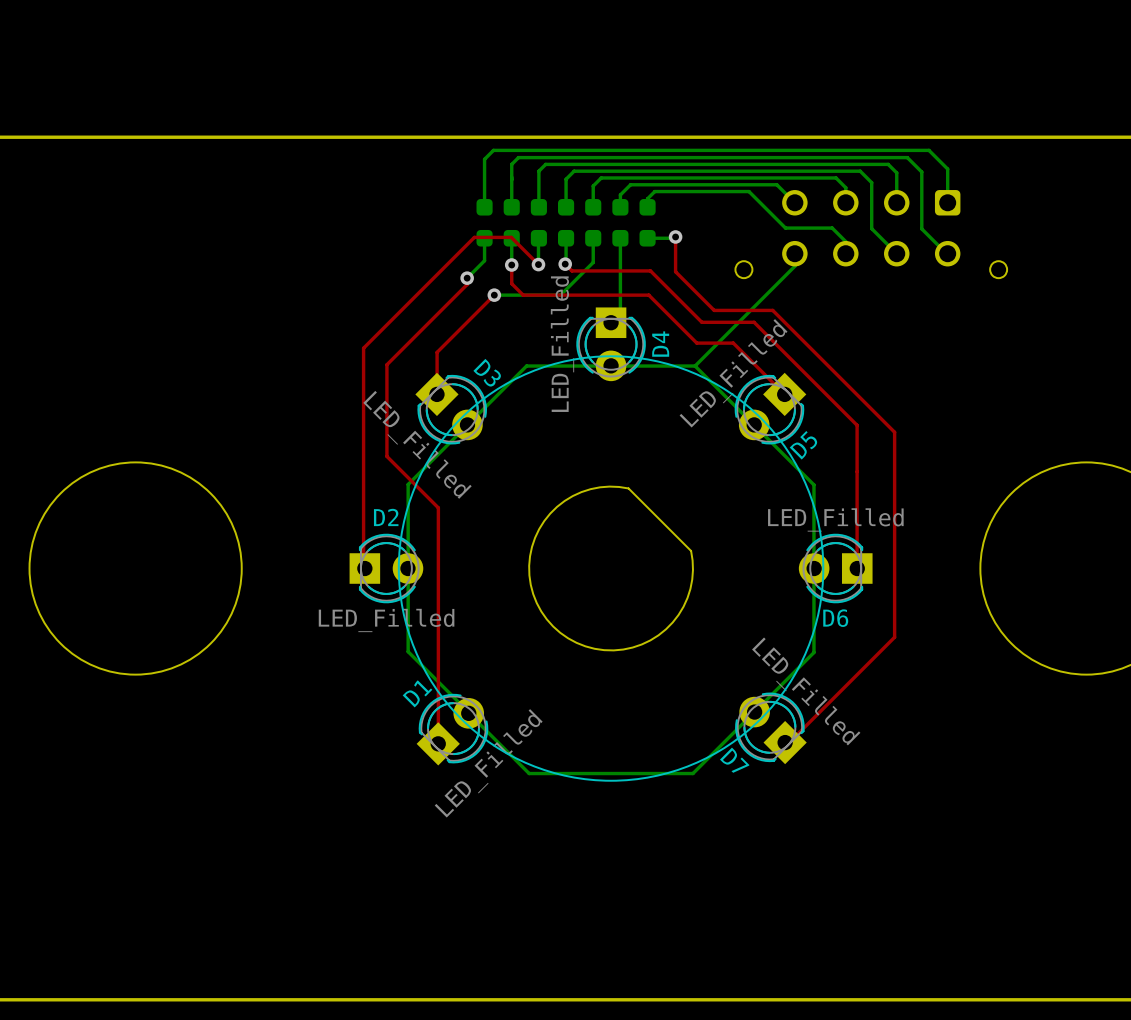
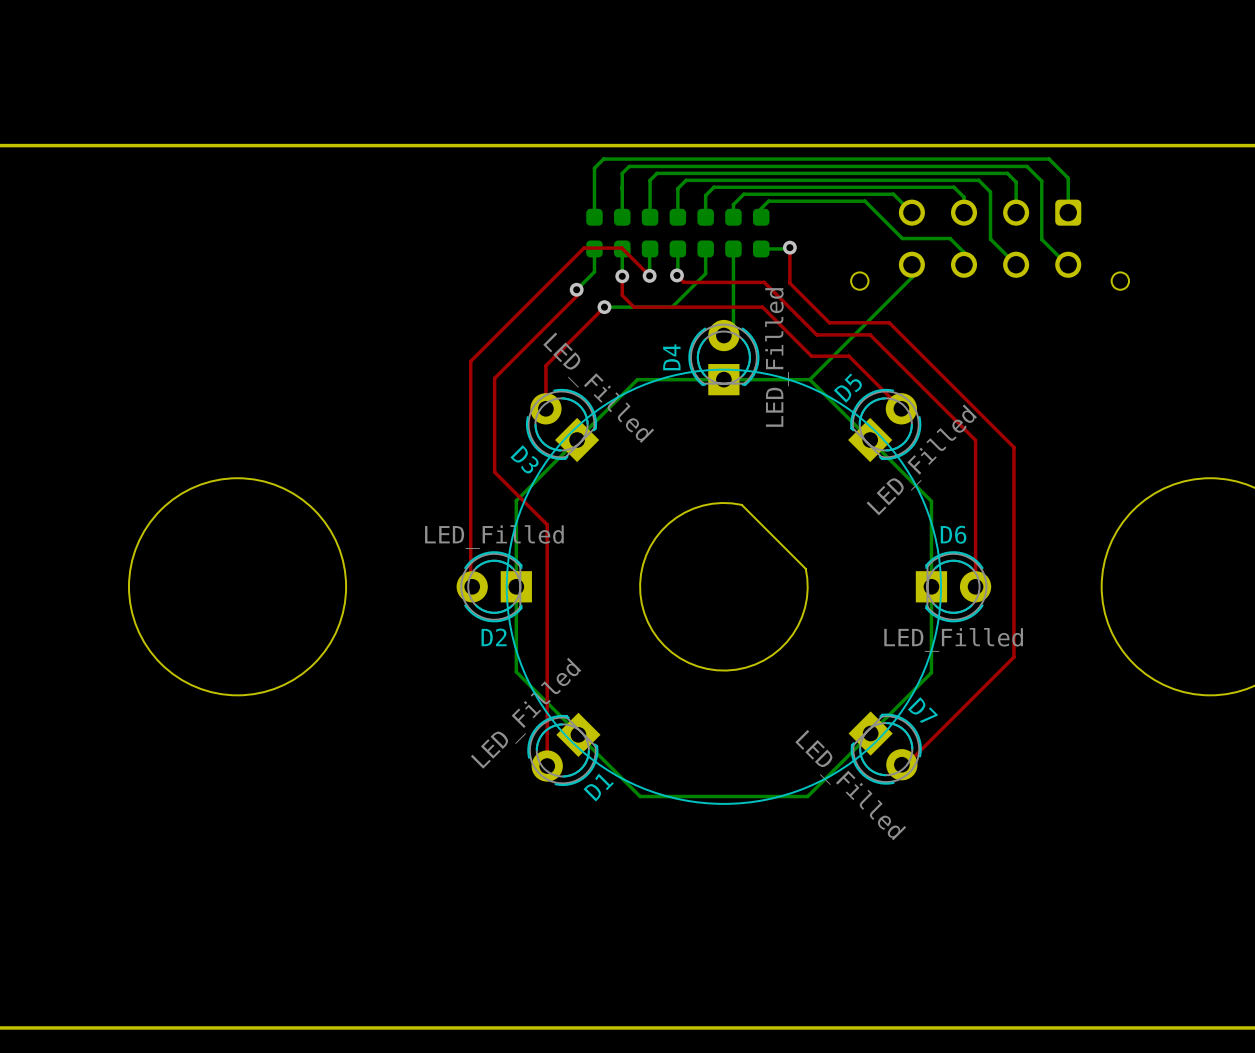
D4 rotation: 0° (611, 344) -> 180° (723, 357)
D3 rotation: 0° (451, 408) -> 180° (562, 425)
D5 rotation: 0° (770, 408) -> 180° (884, 425)
D2 rotation: 0° (386, 568) -> 180° (494, 586)
D6 rotation: 0° (835, 568) -> 180° (953, 586)
D7 rotation: 0° (770, 728) -> 180° (885, 748)
D1 rotation: 0° (452, 729) -> 180° (563, 749)

